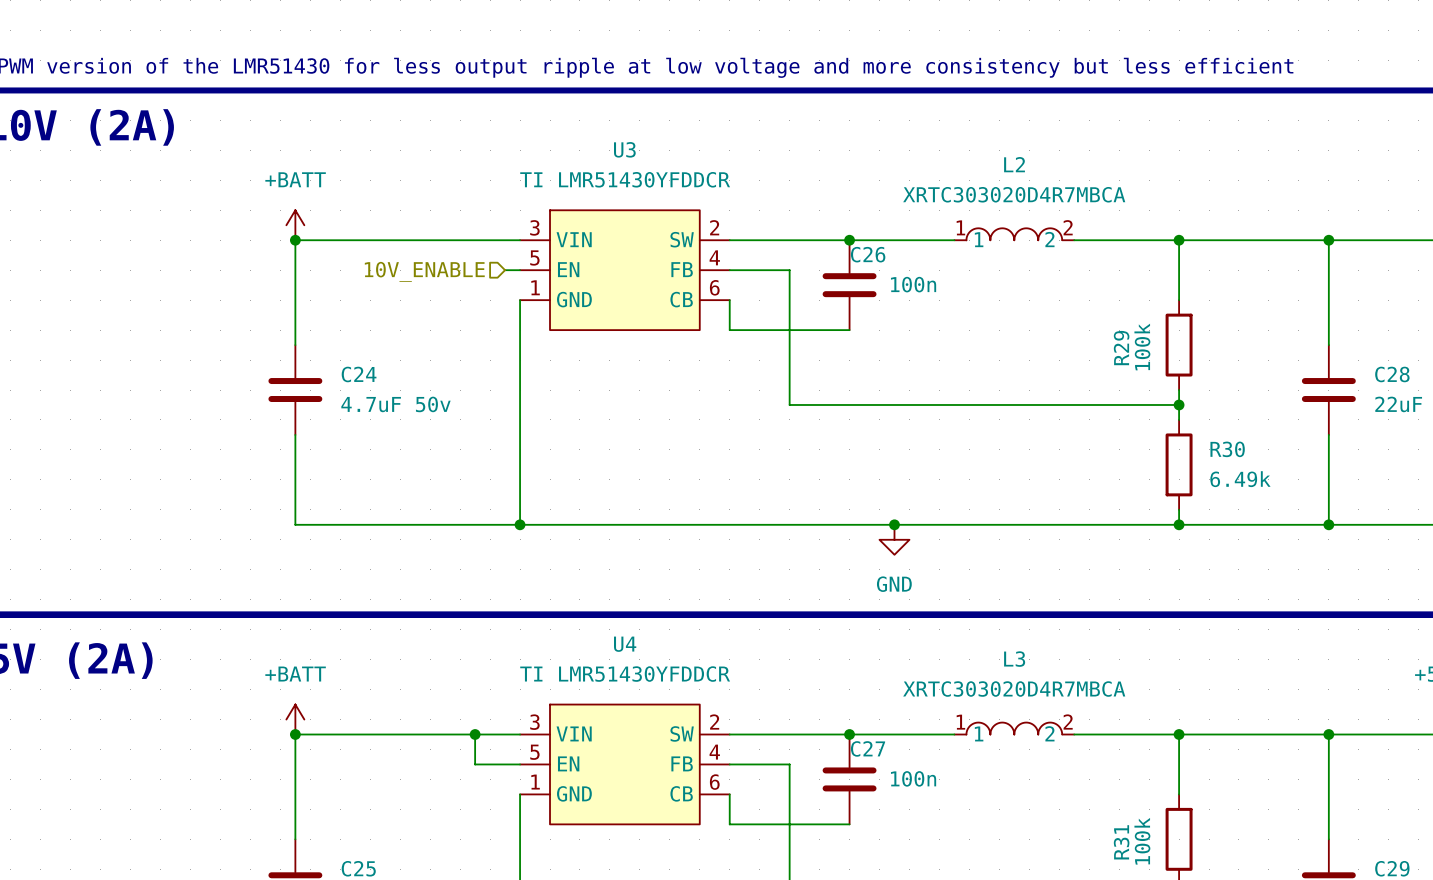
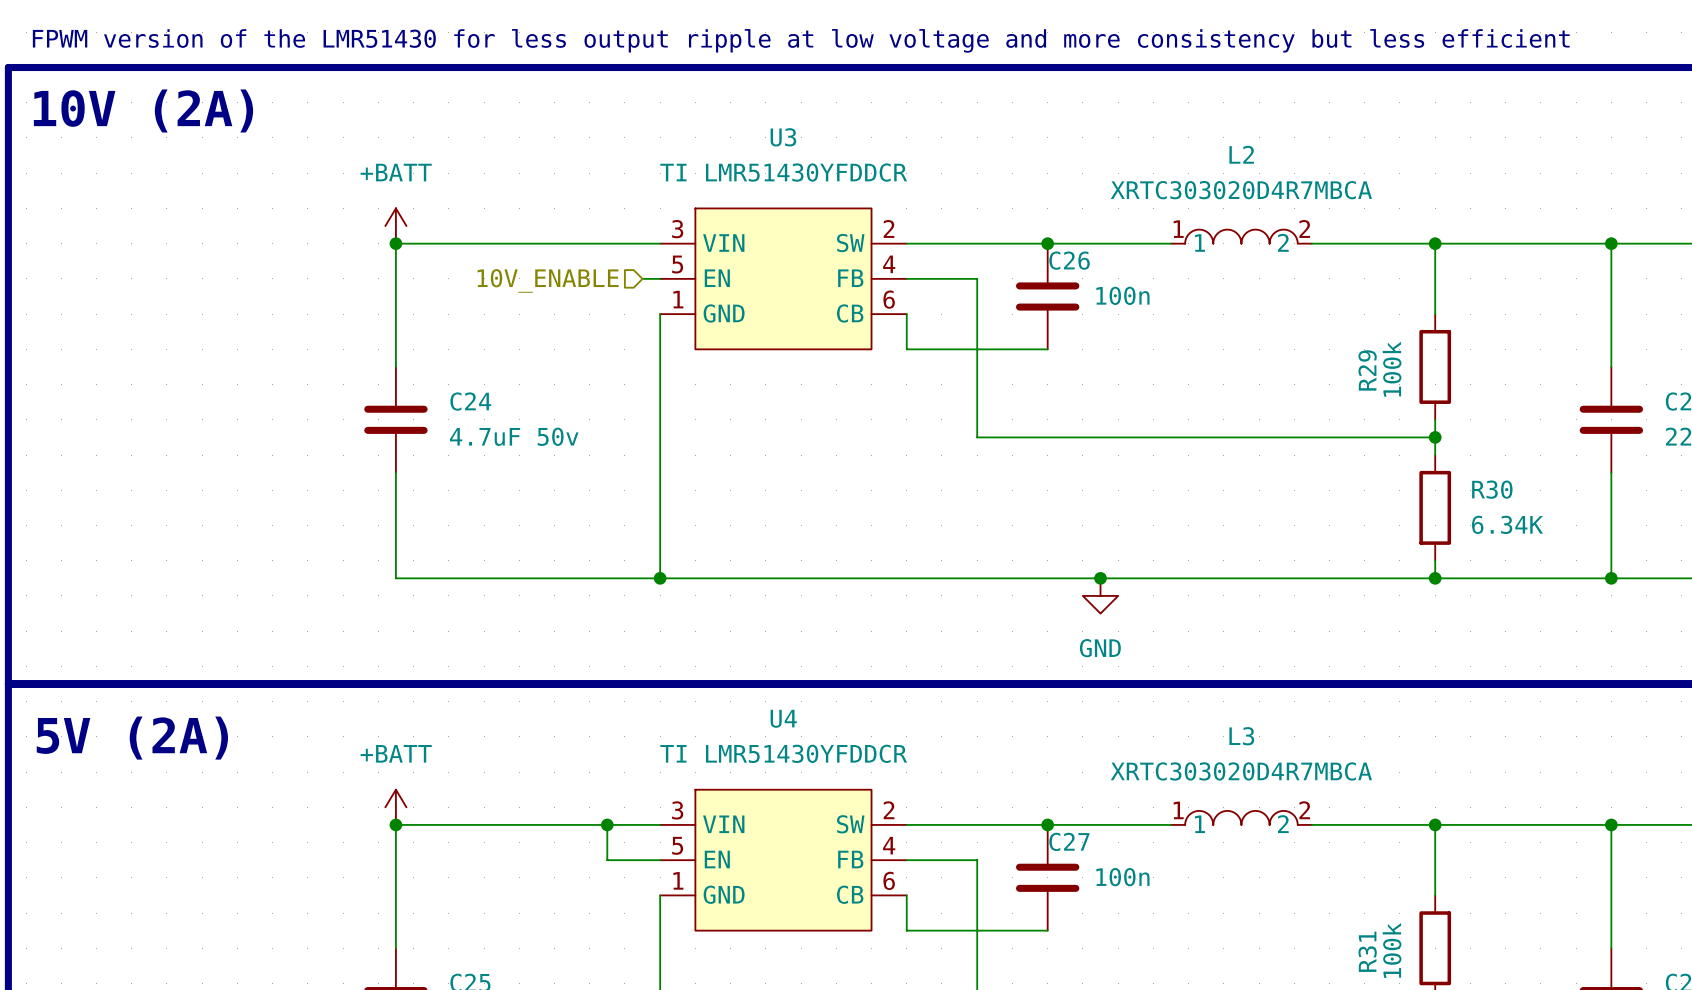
R30 value: 6.49k (1240, 479) -> 6.34K (1507, 524)

